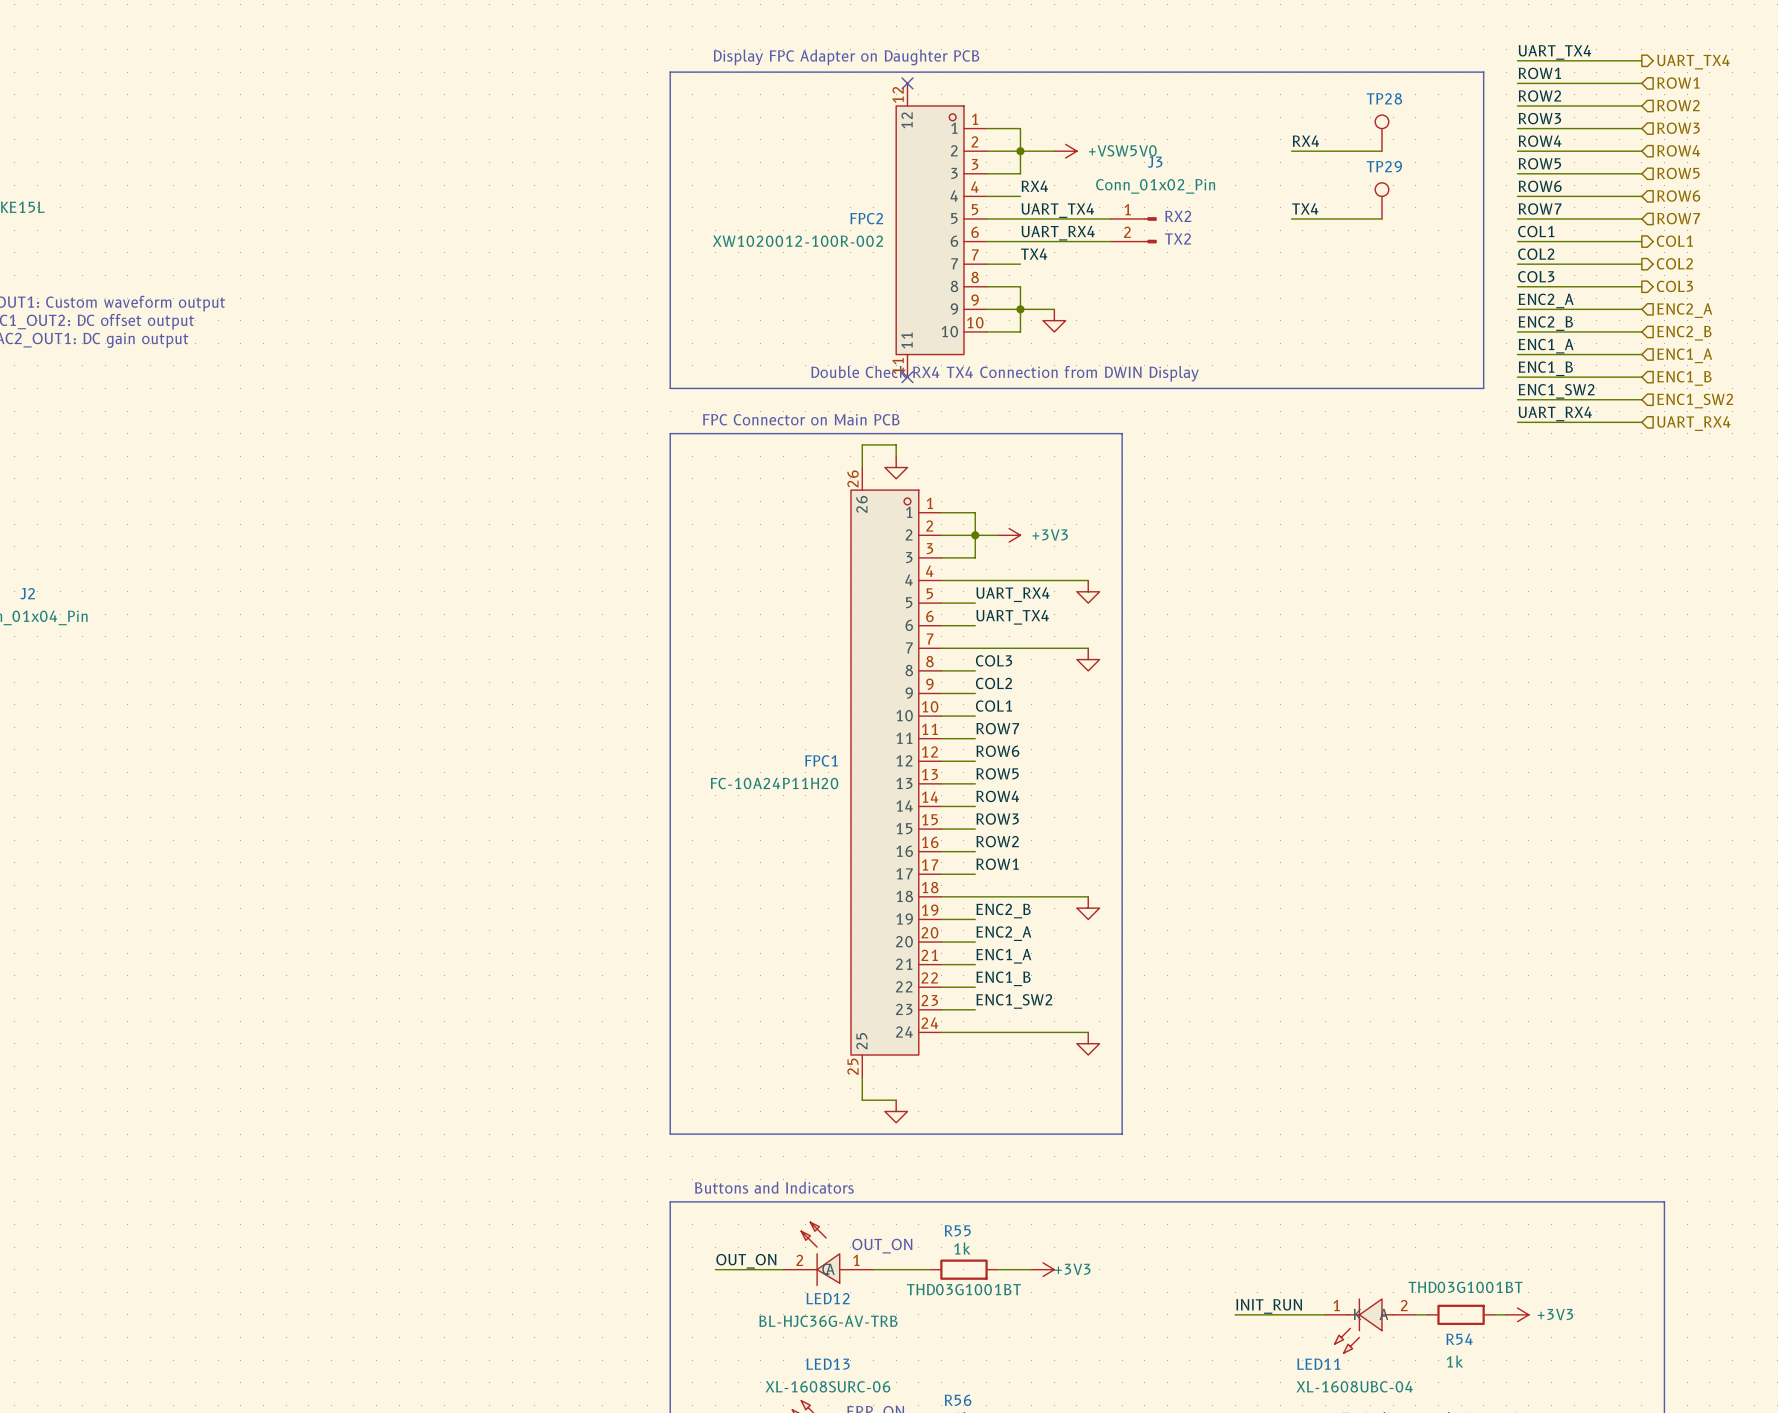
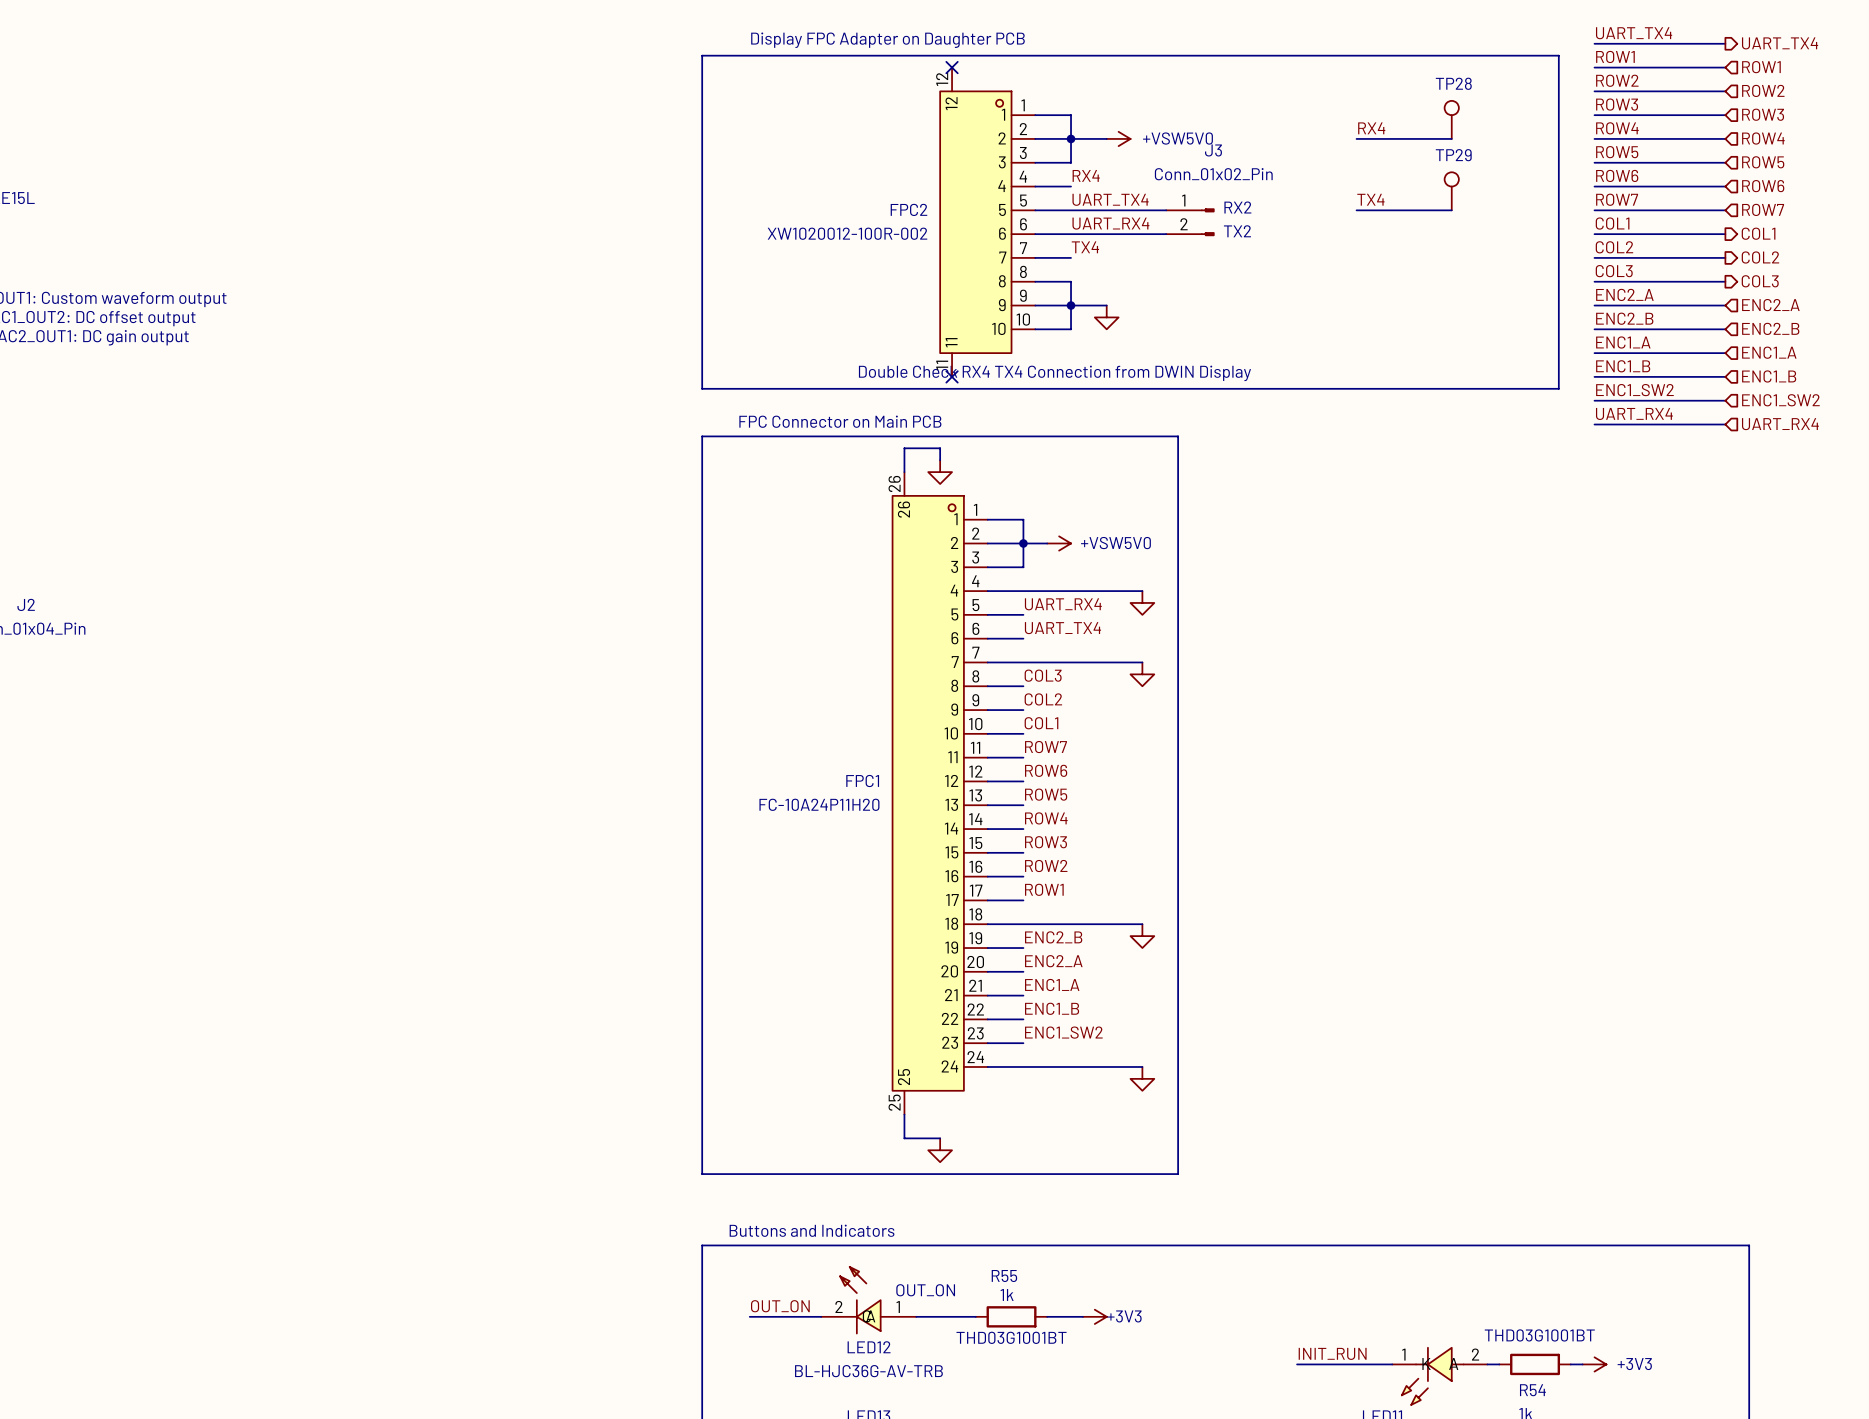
power symbol: +3V3 (1009, 535) -> +VSW5V0 (1059, 543)

